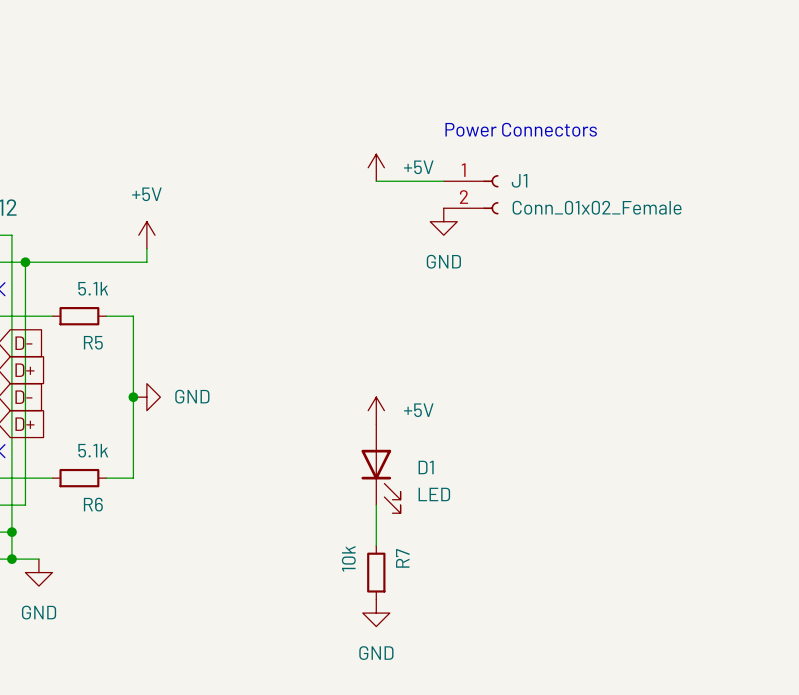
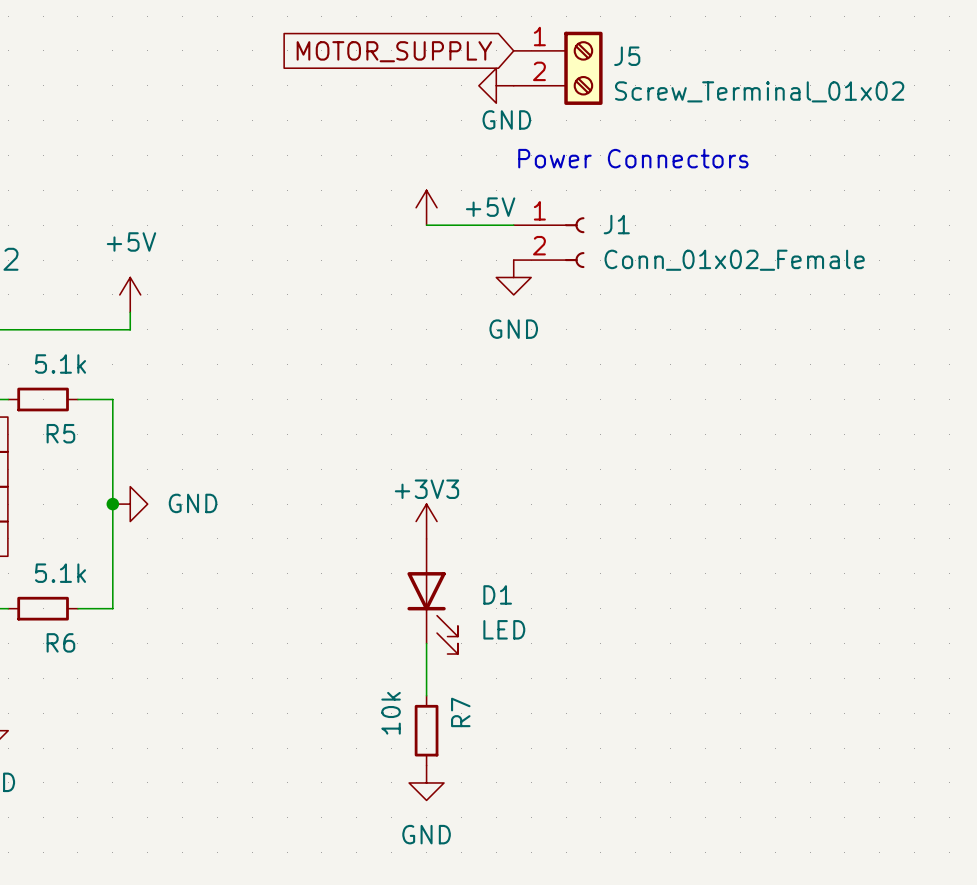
global label: none -> MOTOR_SUPPLY (394, 51)
J5: none -> Screw_Terminal_01x02 (558, 68)
power symbol: none -> GND (496, 85)
power symbol: +5V (376, 410) -> +3V3 (426, 521)

